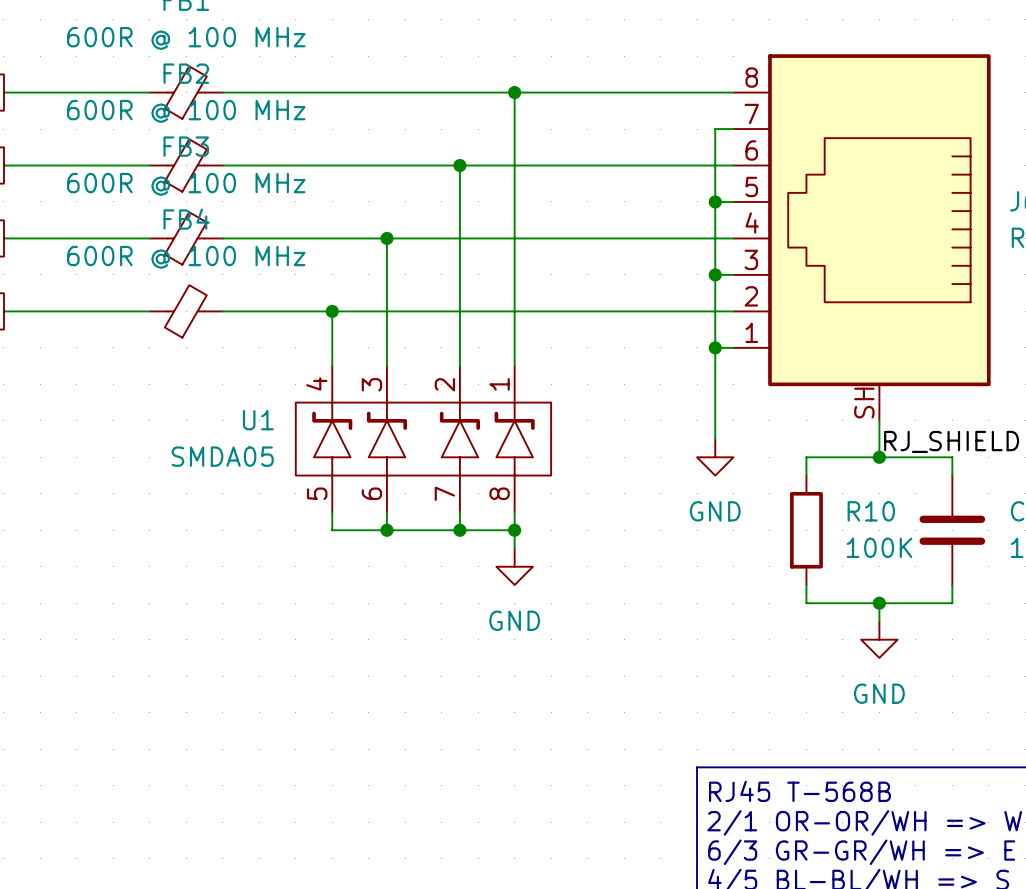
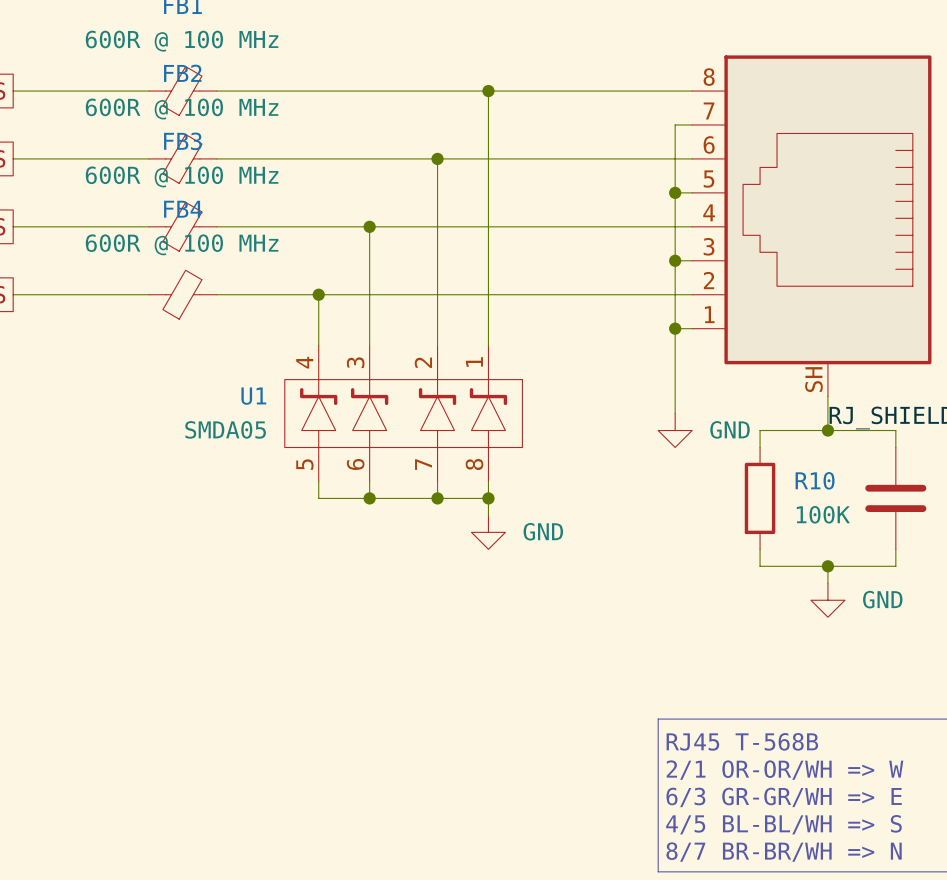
power symbol text position: GND (715, 511) -> GND (730, 429)
power symbol text position: GND (514, 620) -> GND (543, 531)
power symbol text position: GND (879, 693) -> GND (882, 599)

